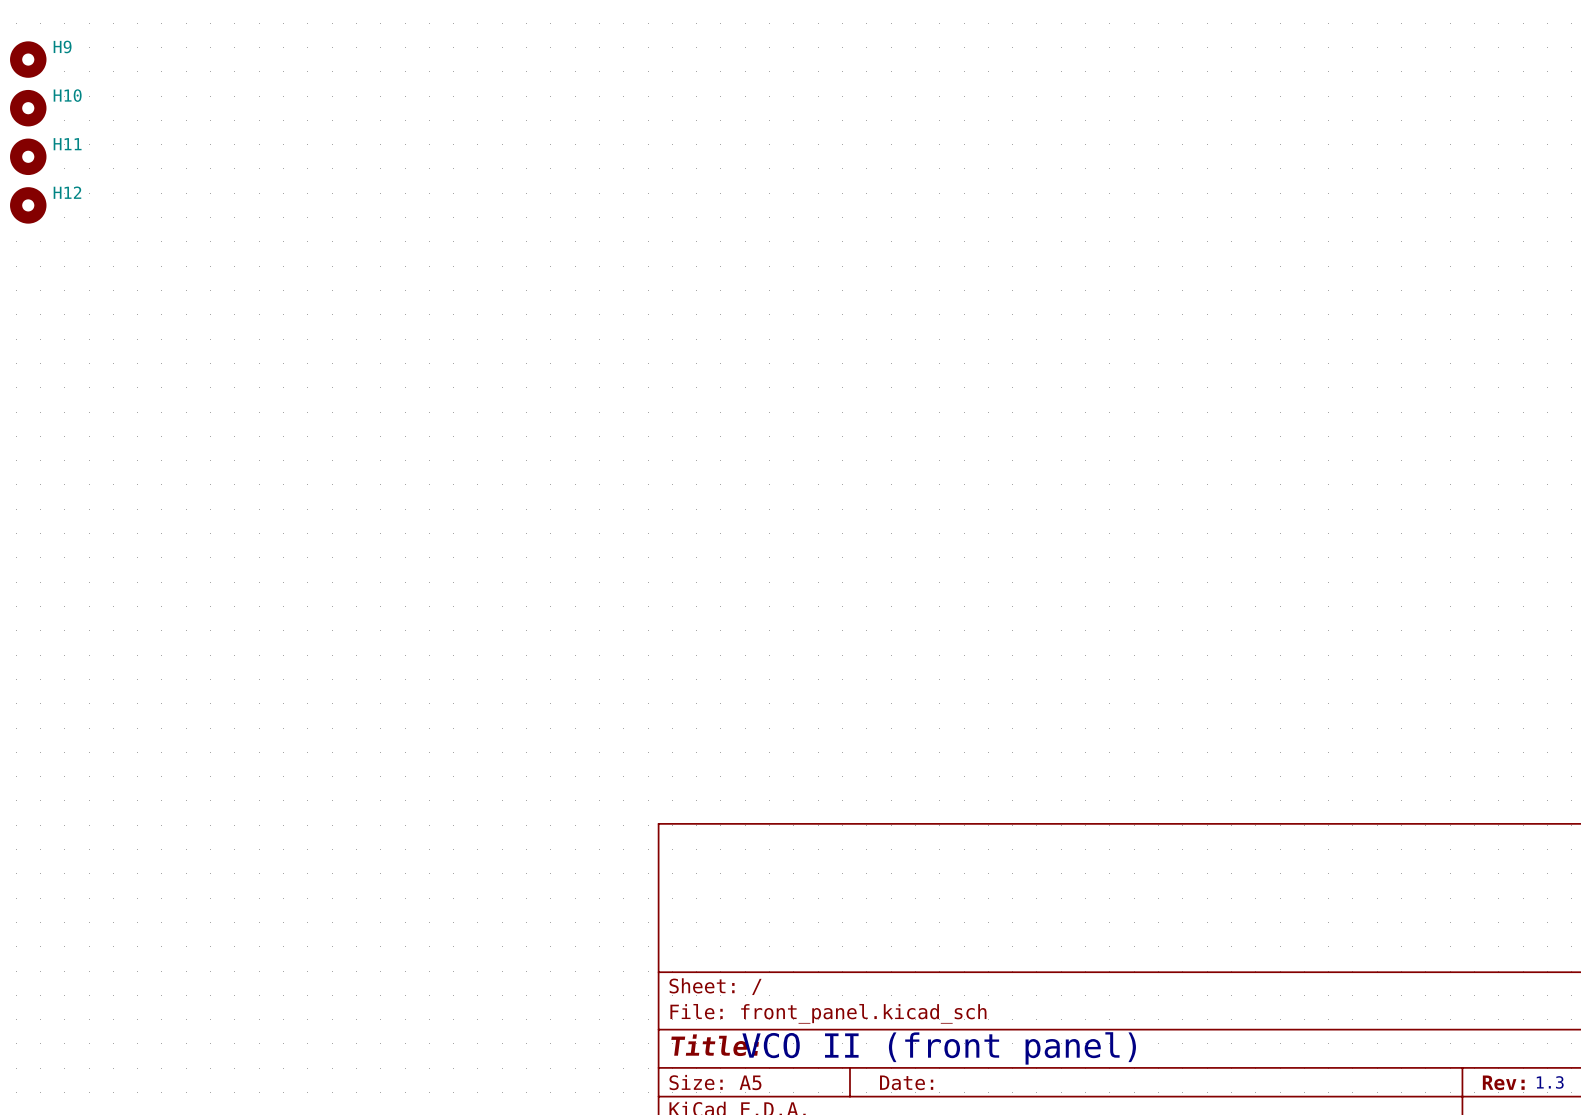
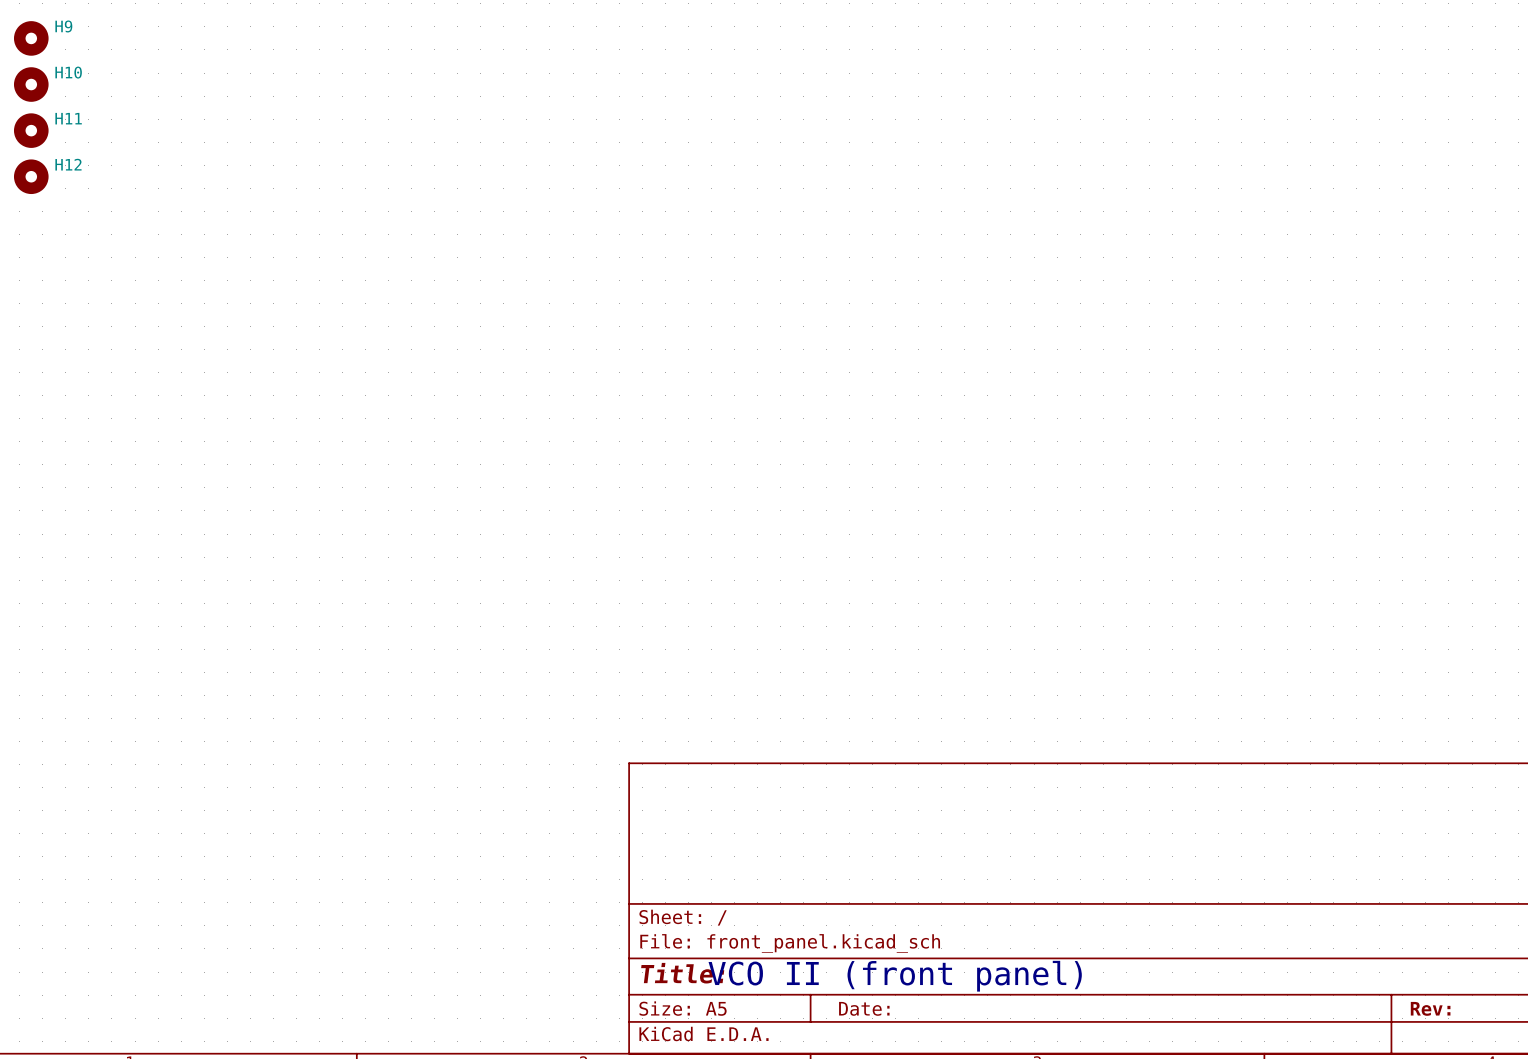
text: 1.3 (1550, 1082) -> none

